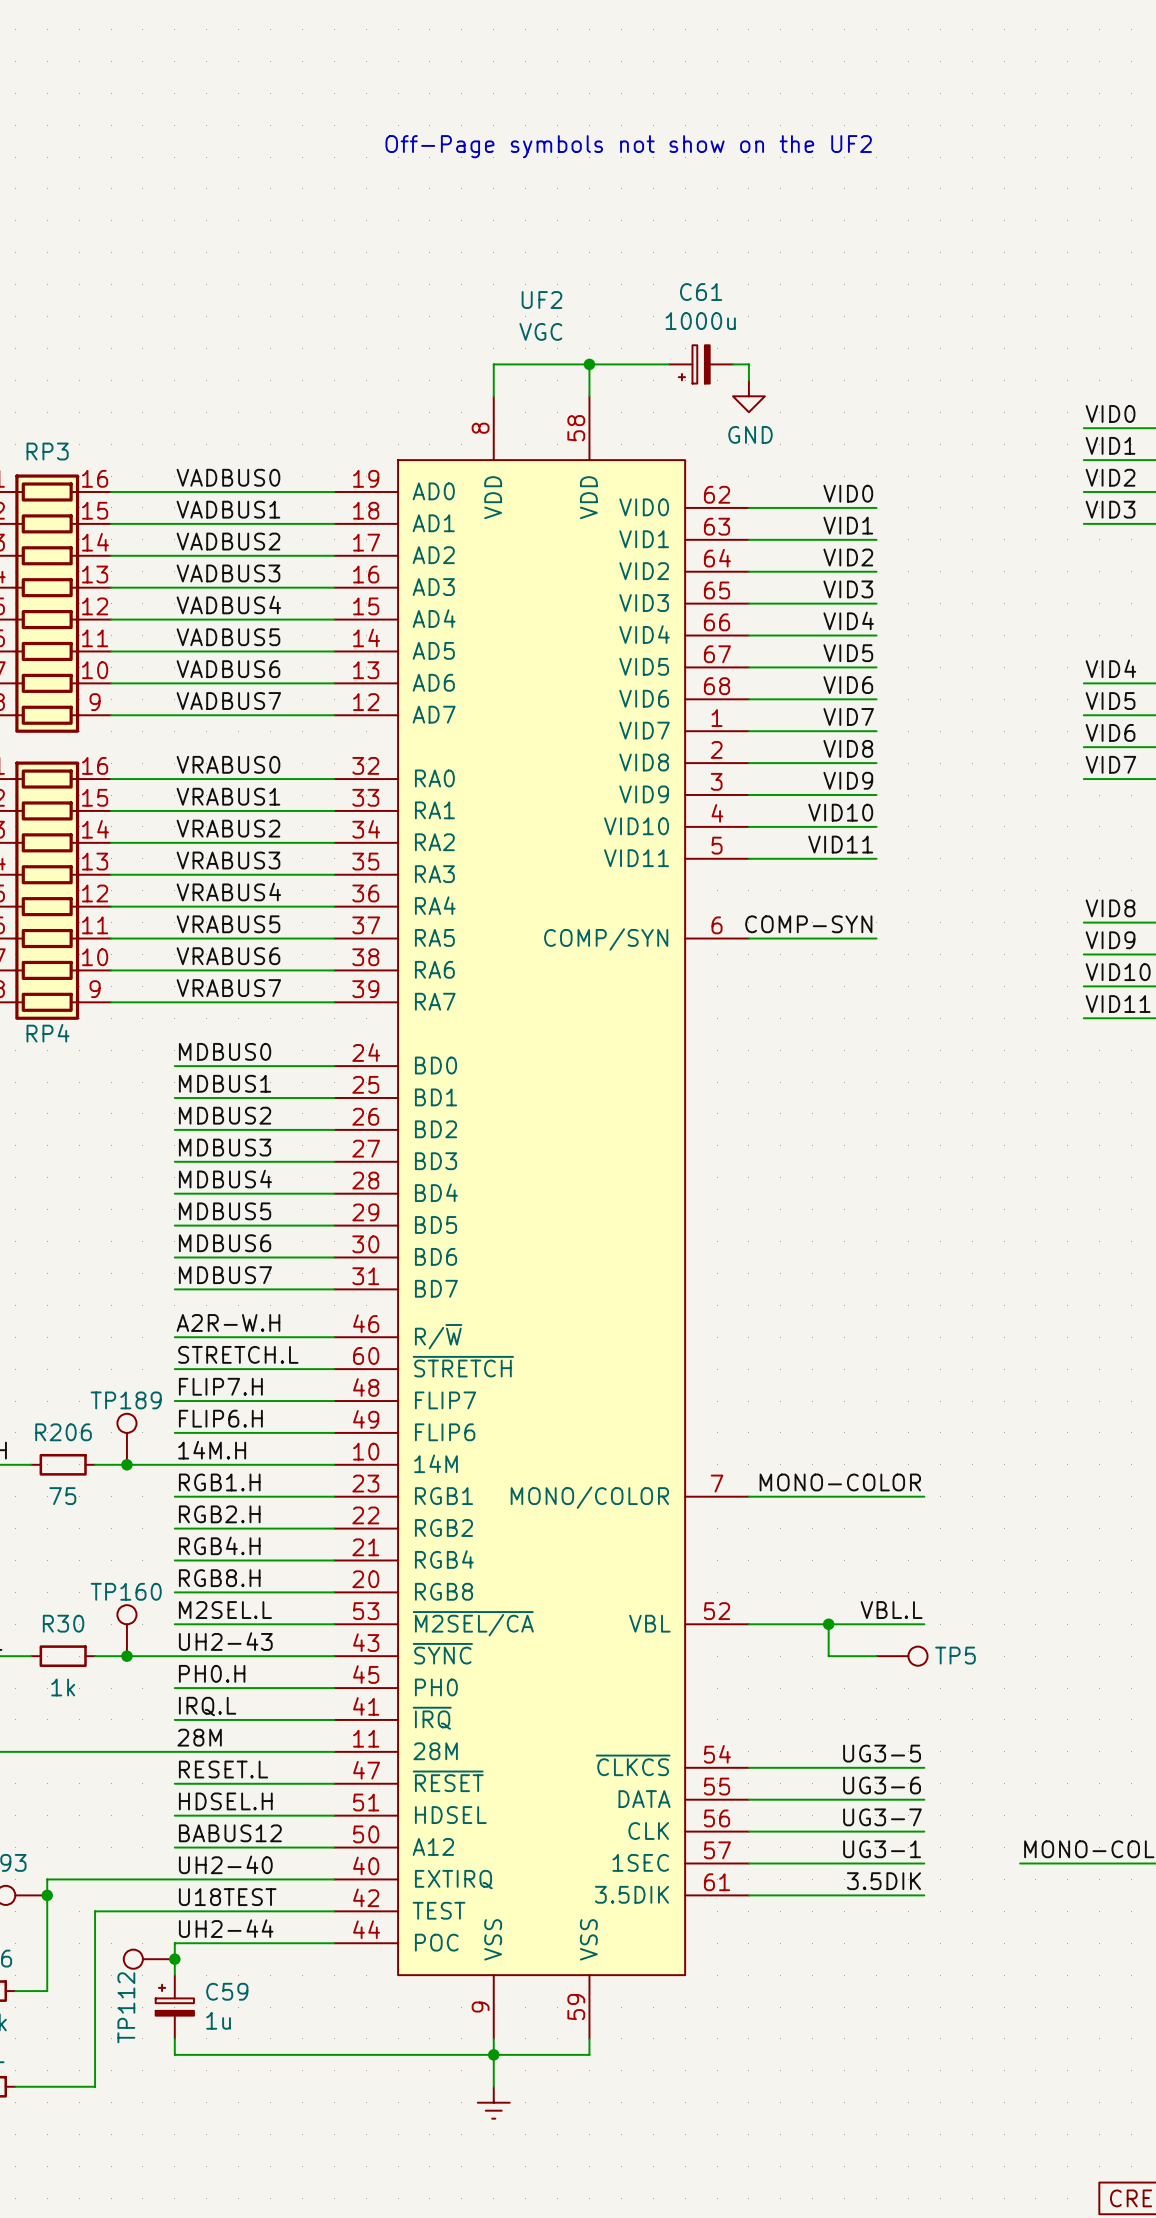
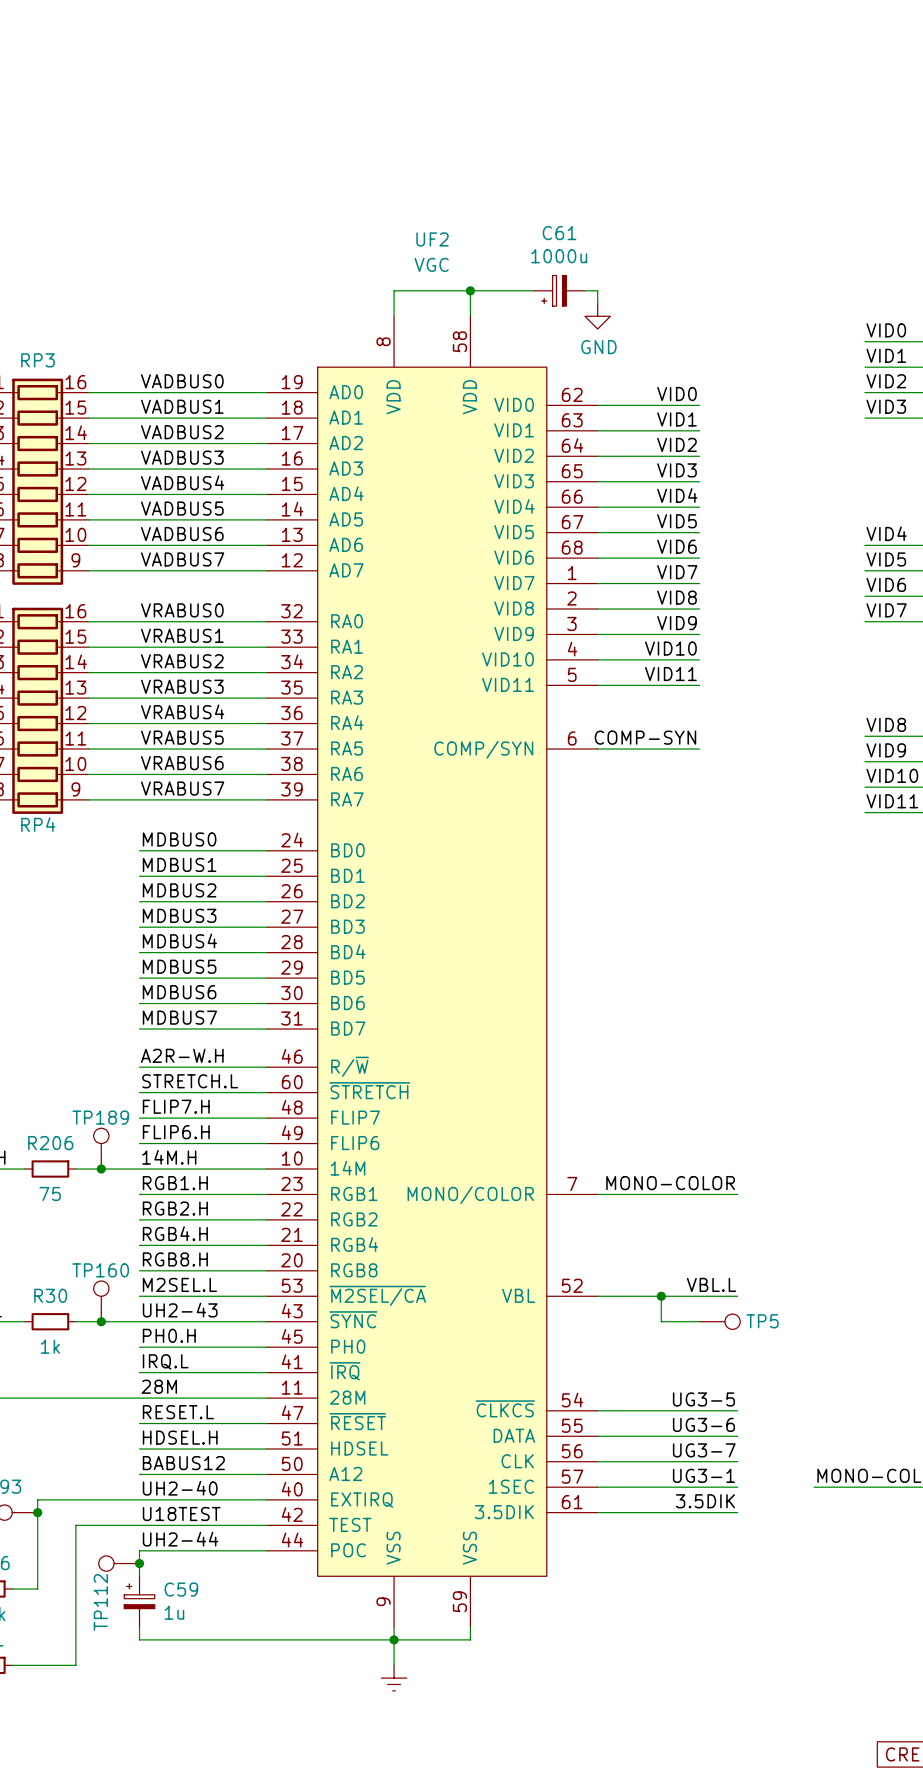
text: Off-Page symbols not show on the UF2 (628, 146) -> none

